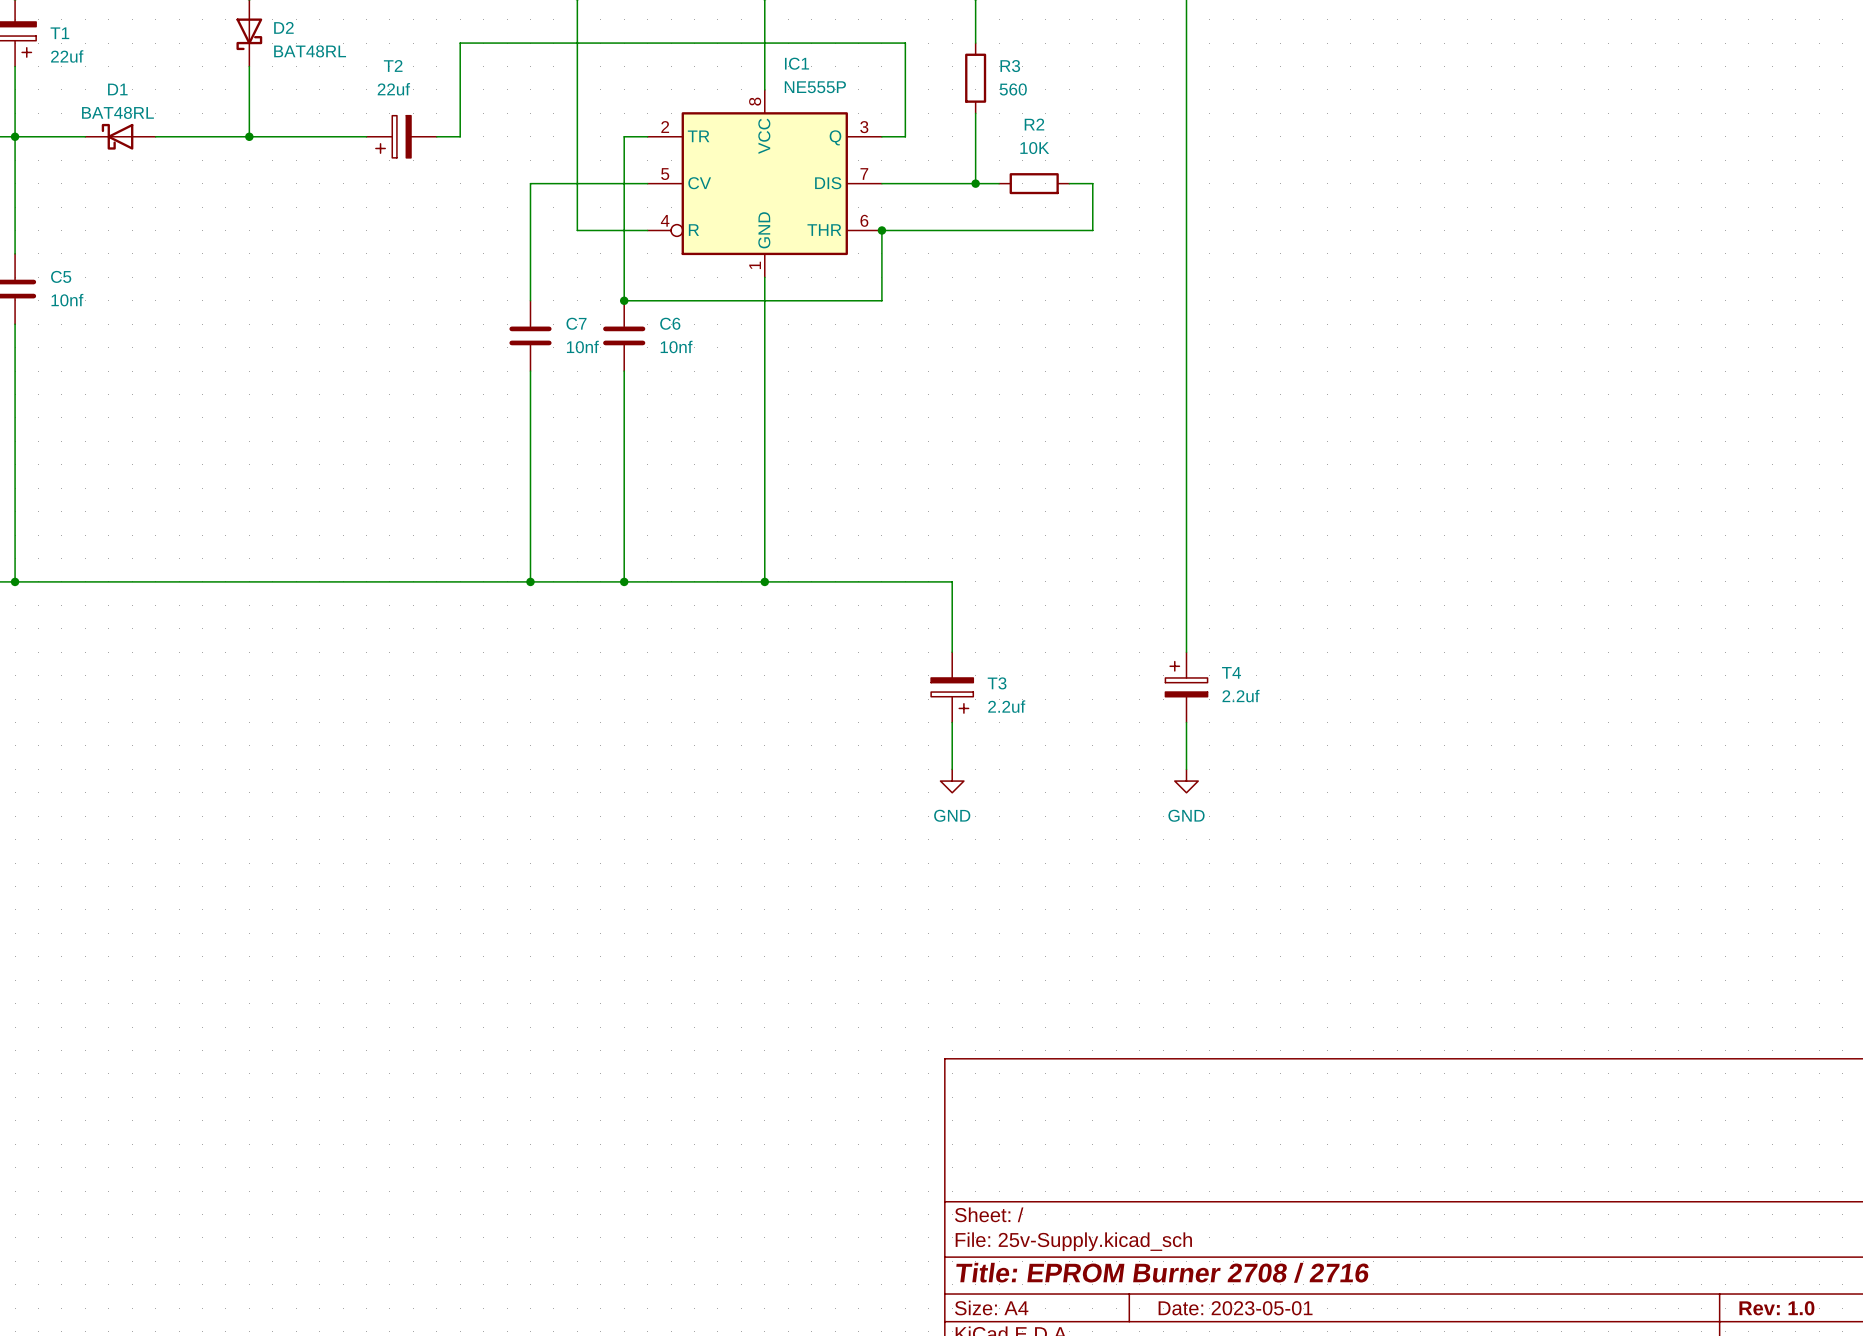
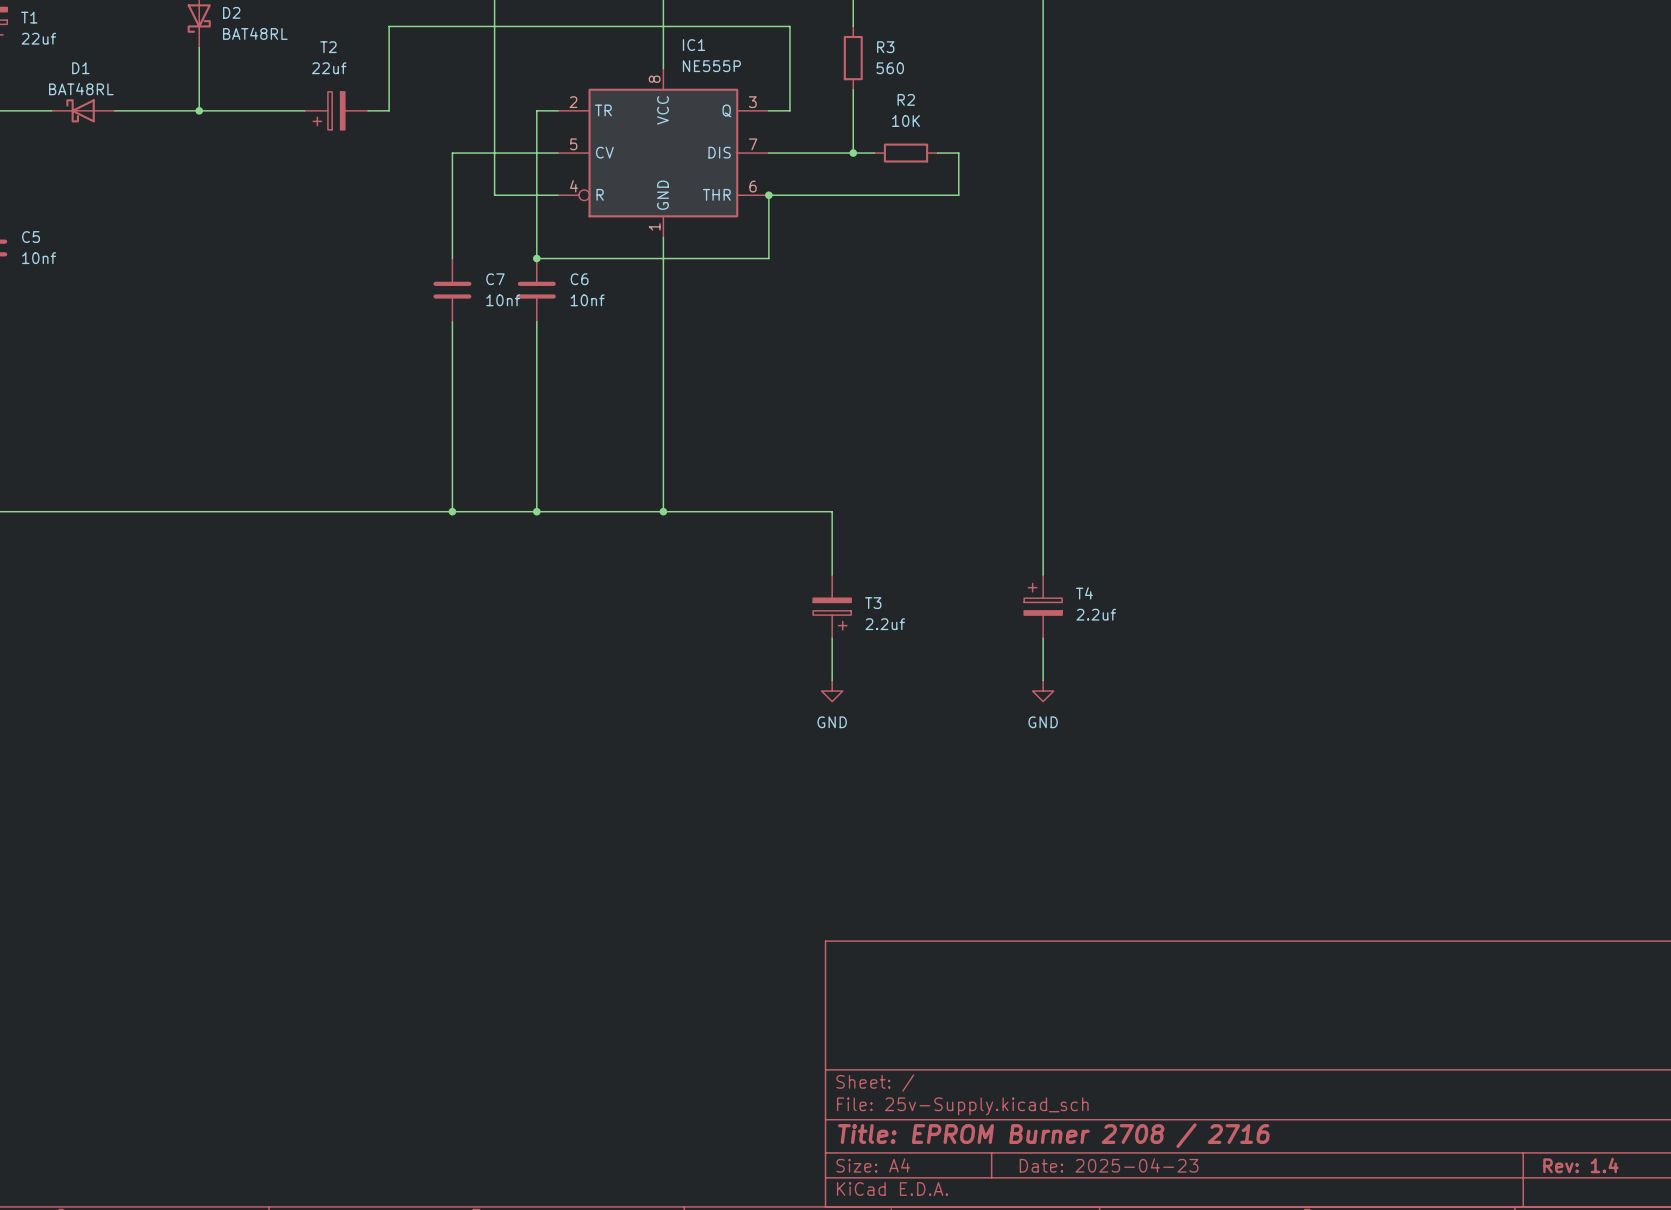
title block: Date: 2023-05-01 (1235, 1308) -> Date: 2025-04-23 (1109, 1165)
title block: Rev: 1.0 (1776, 1308) -> Rev: 1.4 (1580, 1165)

